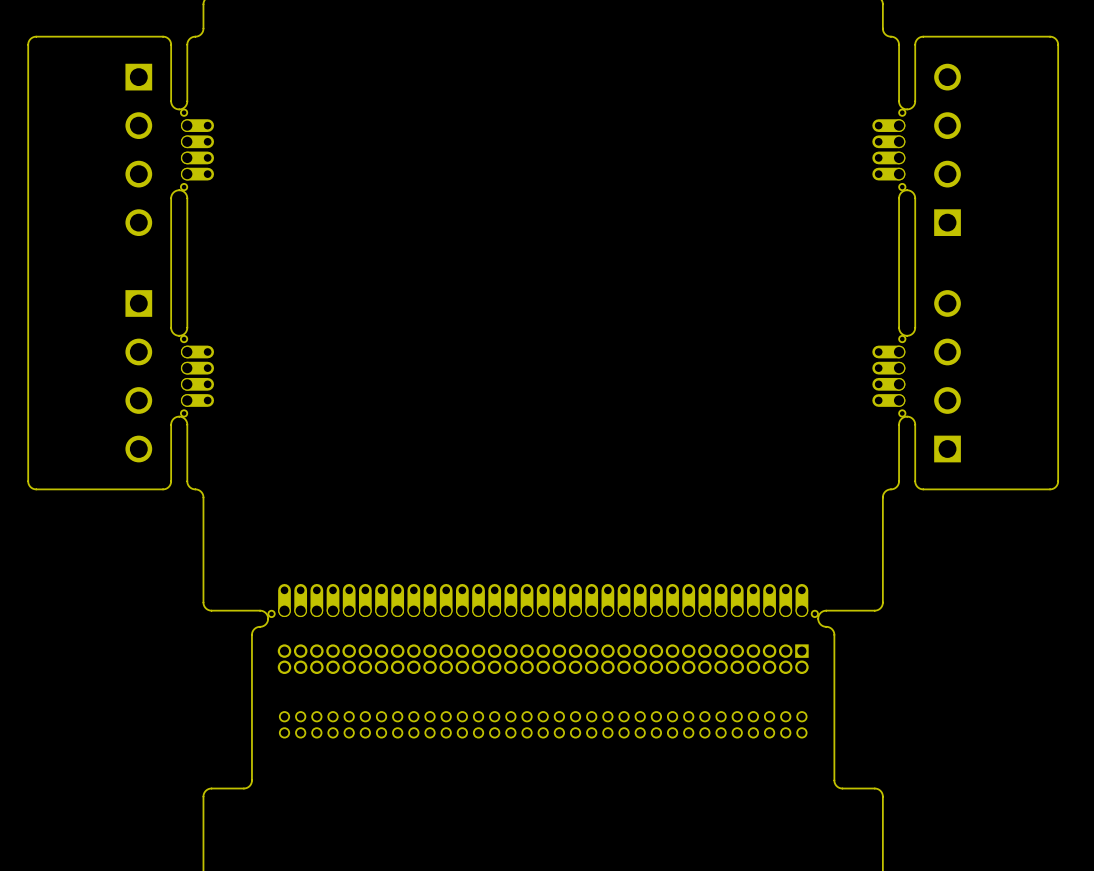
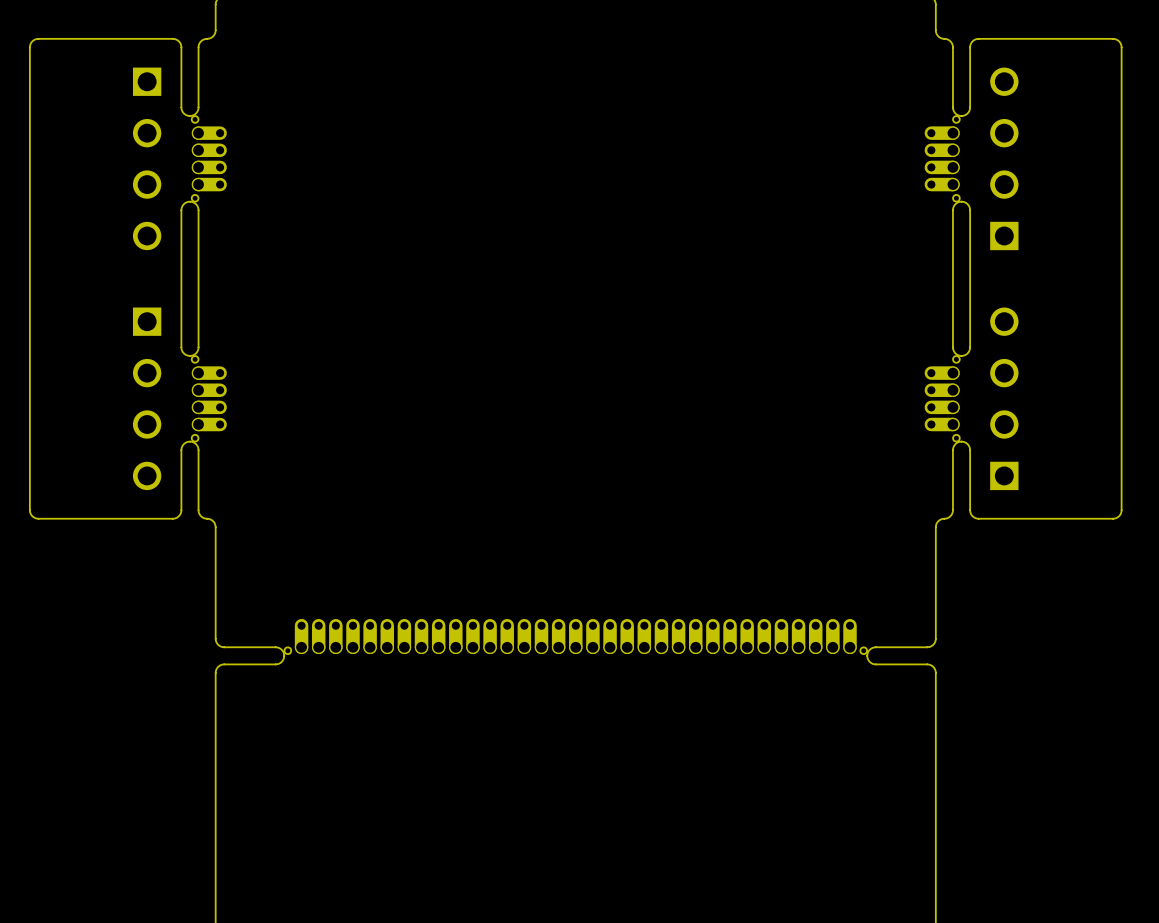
board edge: (260, 626) (254, 629) (251, 634) (251, 783) (244, 788) (209, 788) (205, 791) (203, 796) -> (275, 664) (223, 664) (216, 670) (215, 844)
board edge: (826, 626) (832, 629) (834, 634) (834, 783) (841, 788) (876, 788) (881, 791) (882, 796) -> (875, 664) (928, 664) (935, 670) (935, 844)
part: (543, 659) -> none
part: (543, 724) -> none

